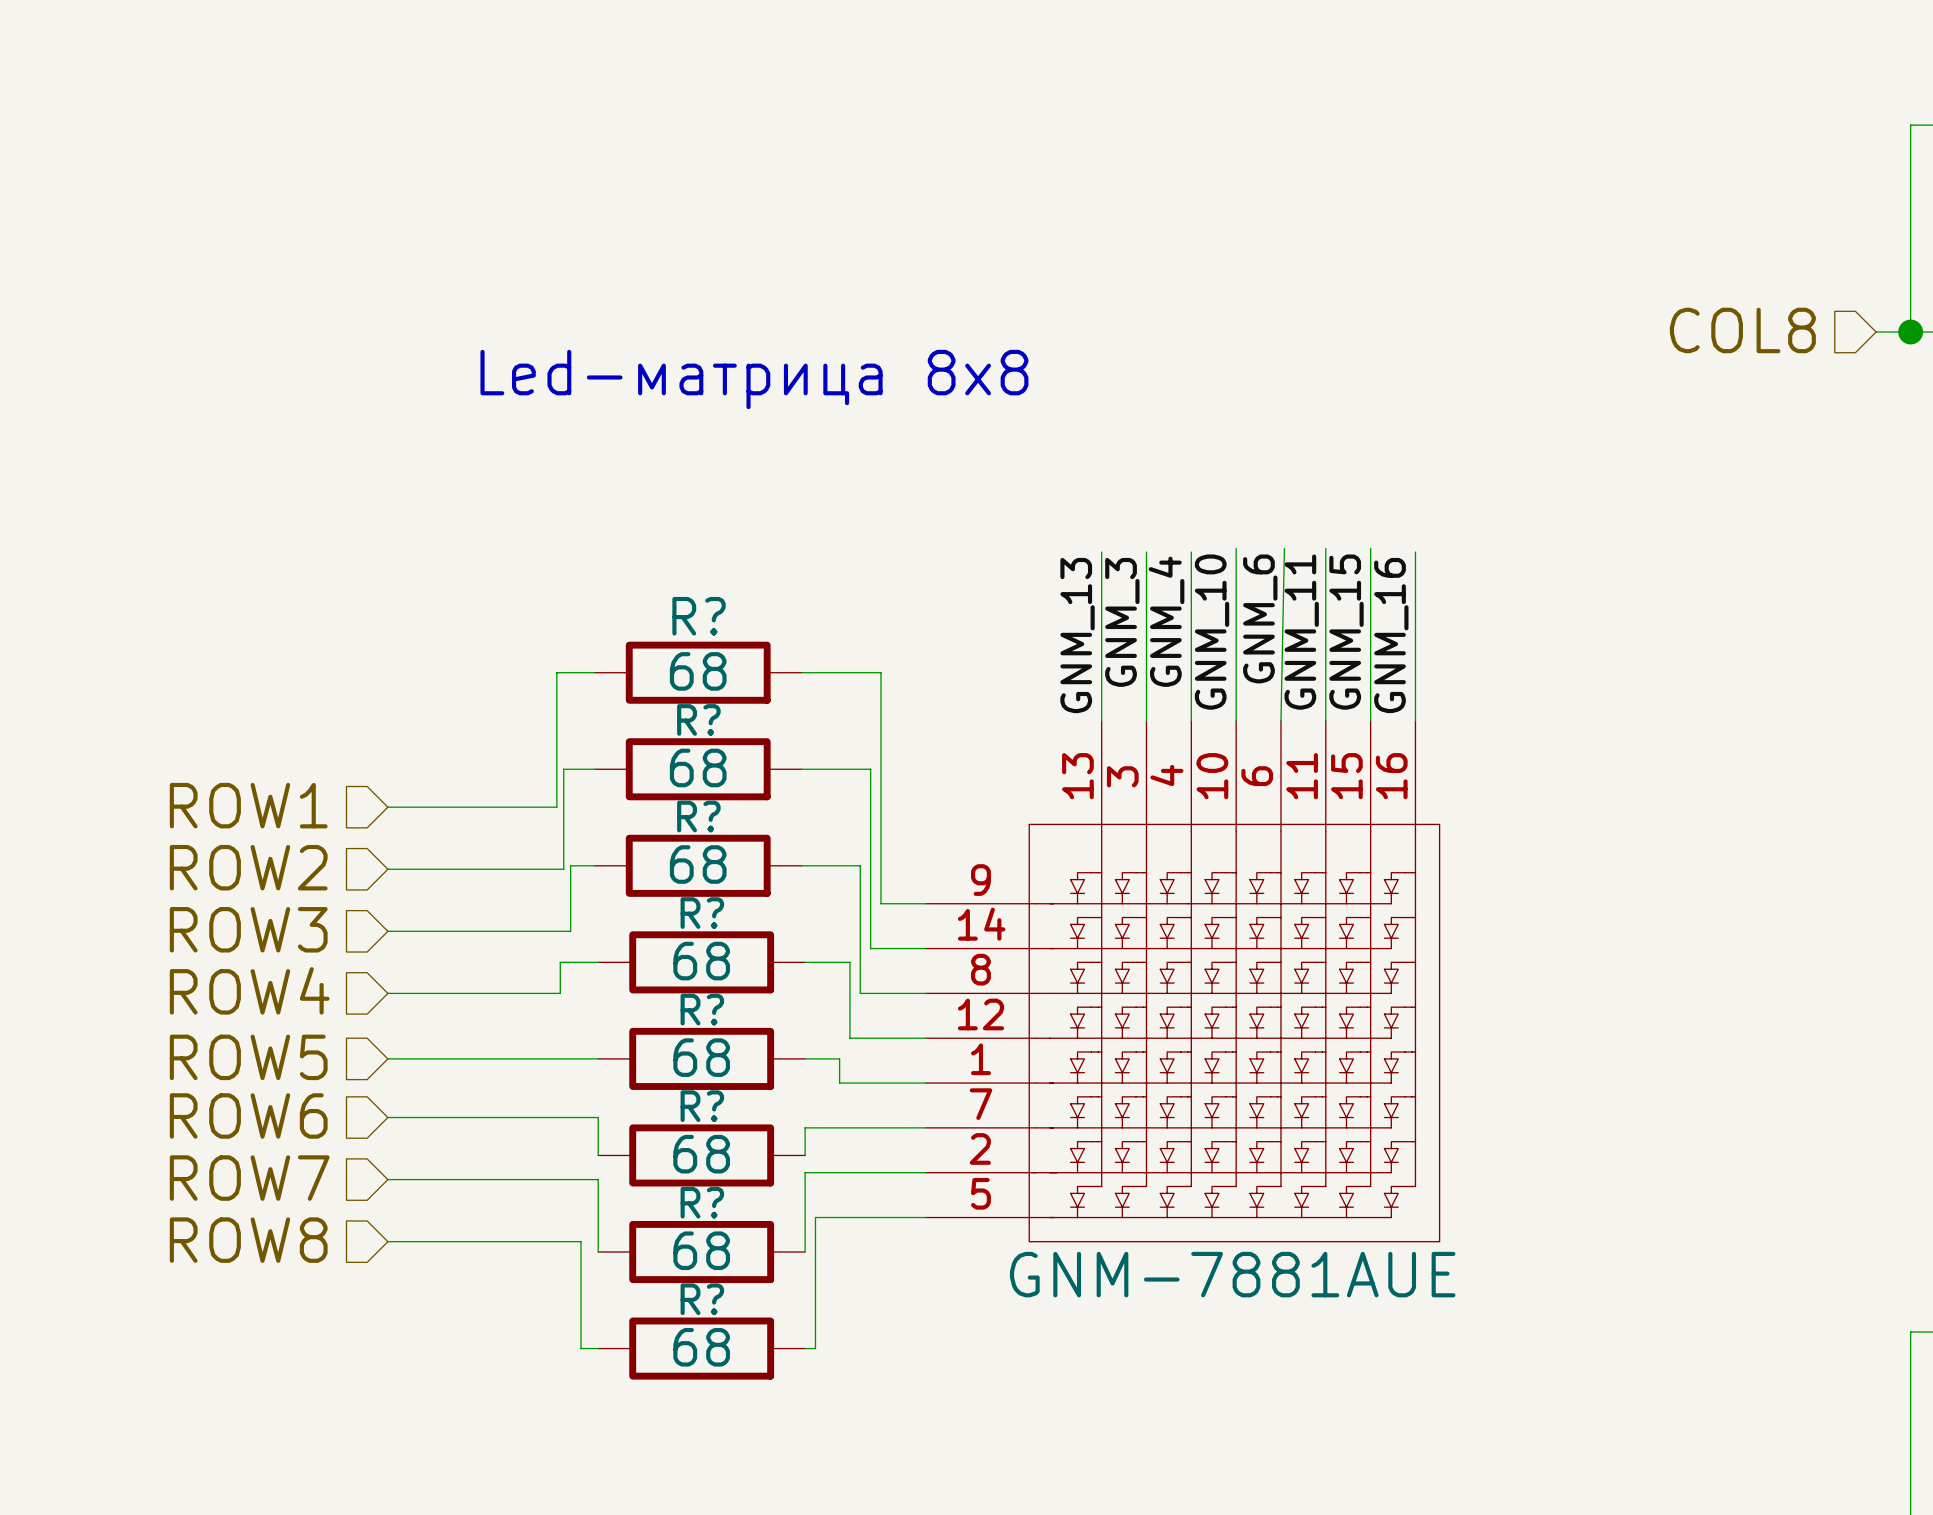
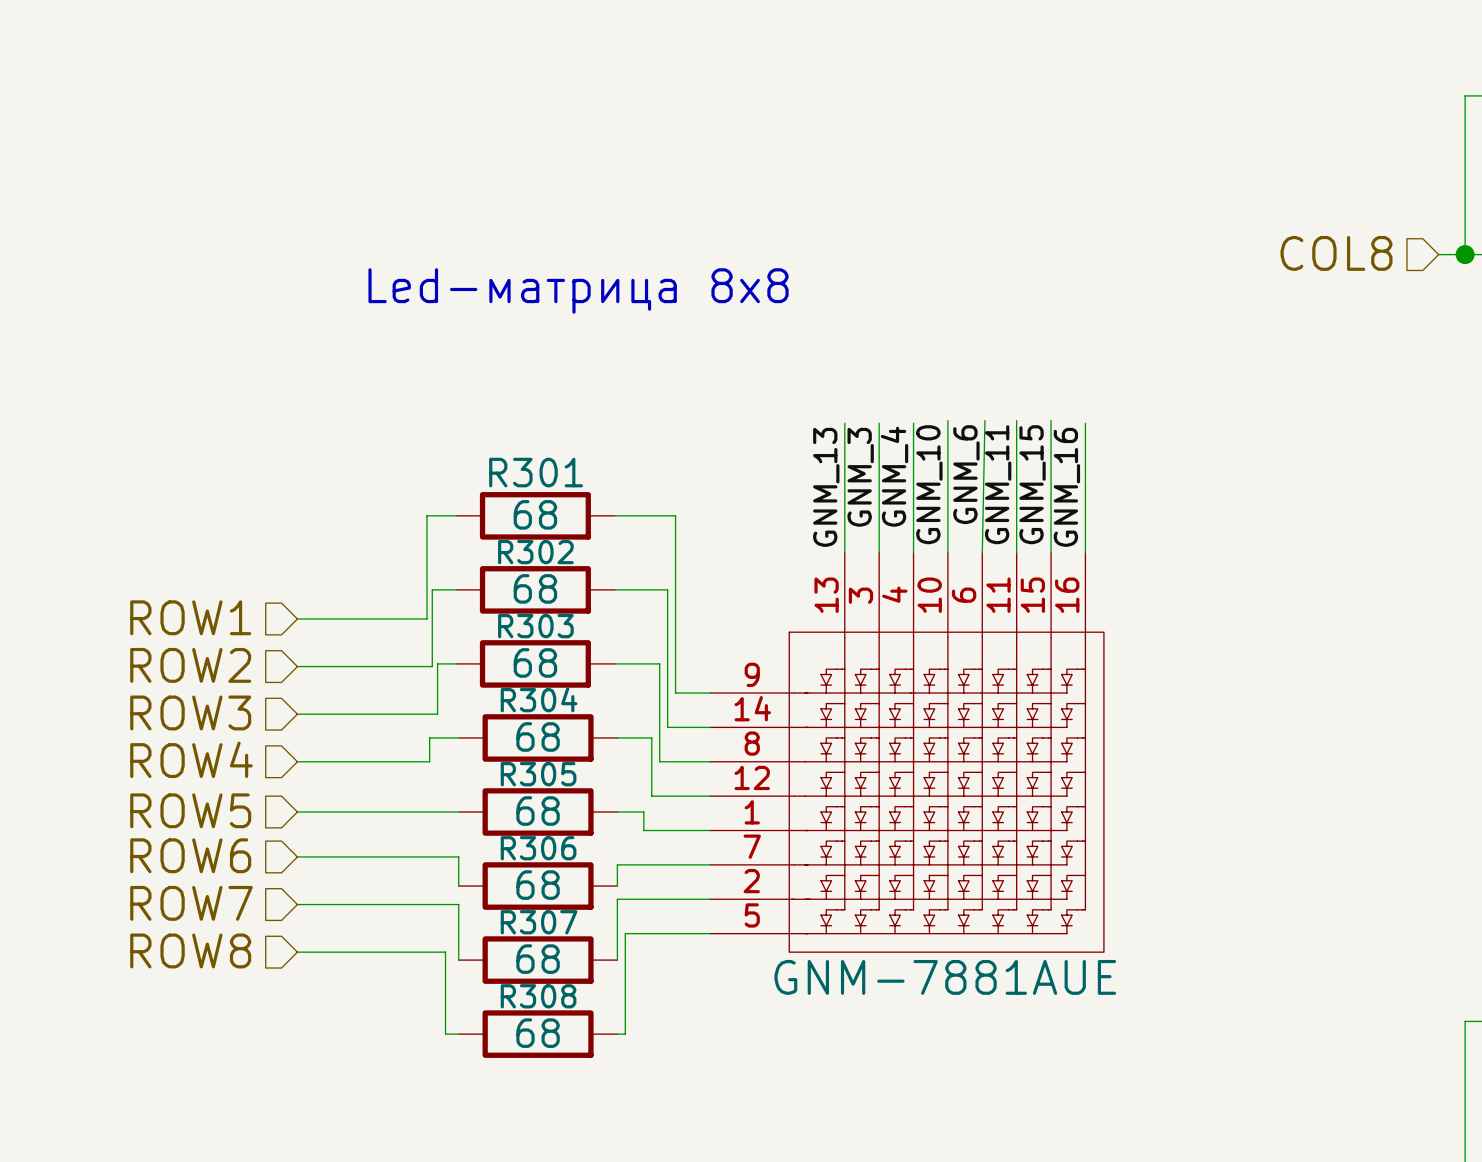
R? name: R? (699, 616) -> R301 (536, 472)
R? name: R? (698, 719) -> R302 (535, 552)
R? name: R? (698, 816) -> R303 (535, 626)
R? name: R? (702, 913) -> R304 (539, 699)
R? name: R? (702, 1009) -> R305 (538, 774)
R? name: R? (702, 1106) -> R306 (538, 848)
R? name: R? (702, 1202) -> R307 (539, 922)
R? name: R? (702, 1299) -> R308 (538, 996)

